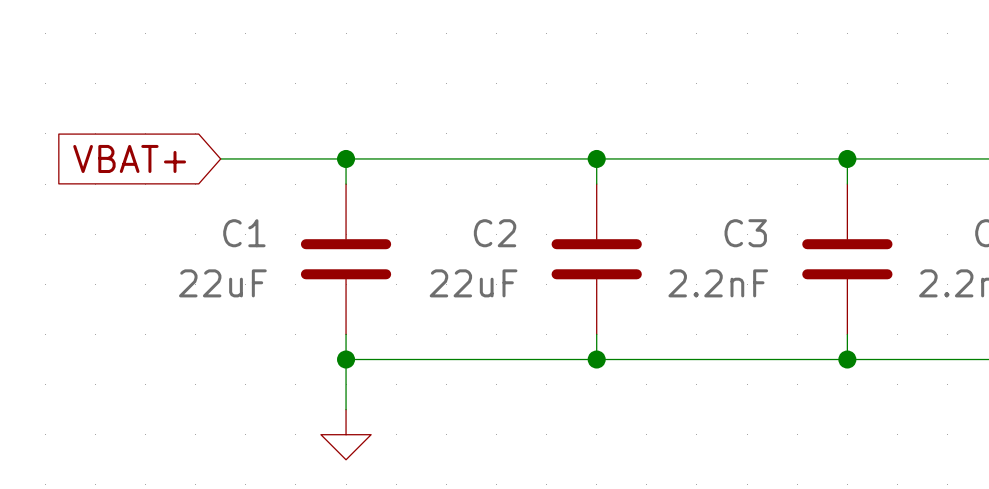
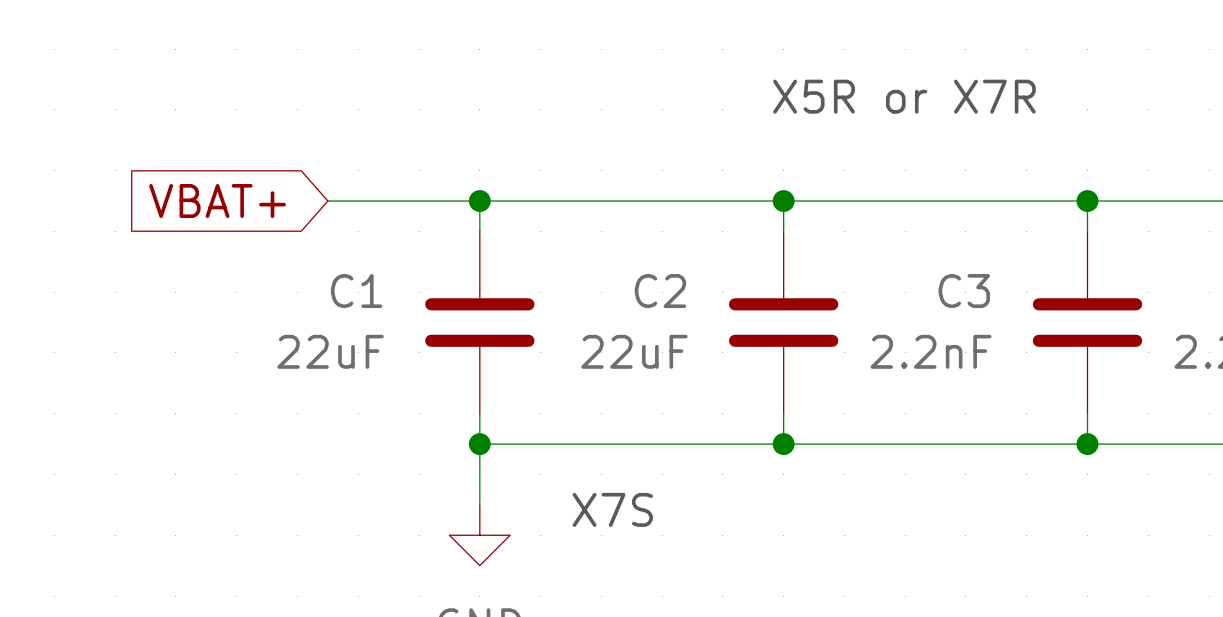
text: none -> X5R or X7R (904, 96)
text: none -> X7S (612, 509)

